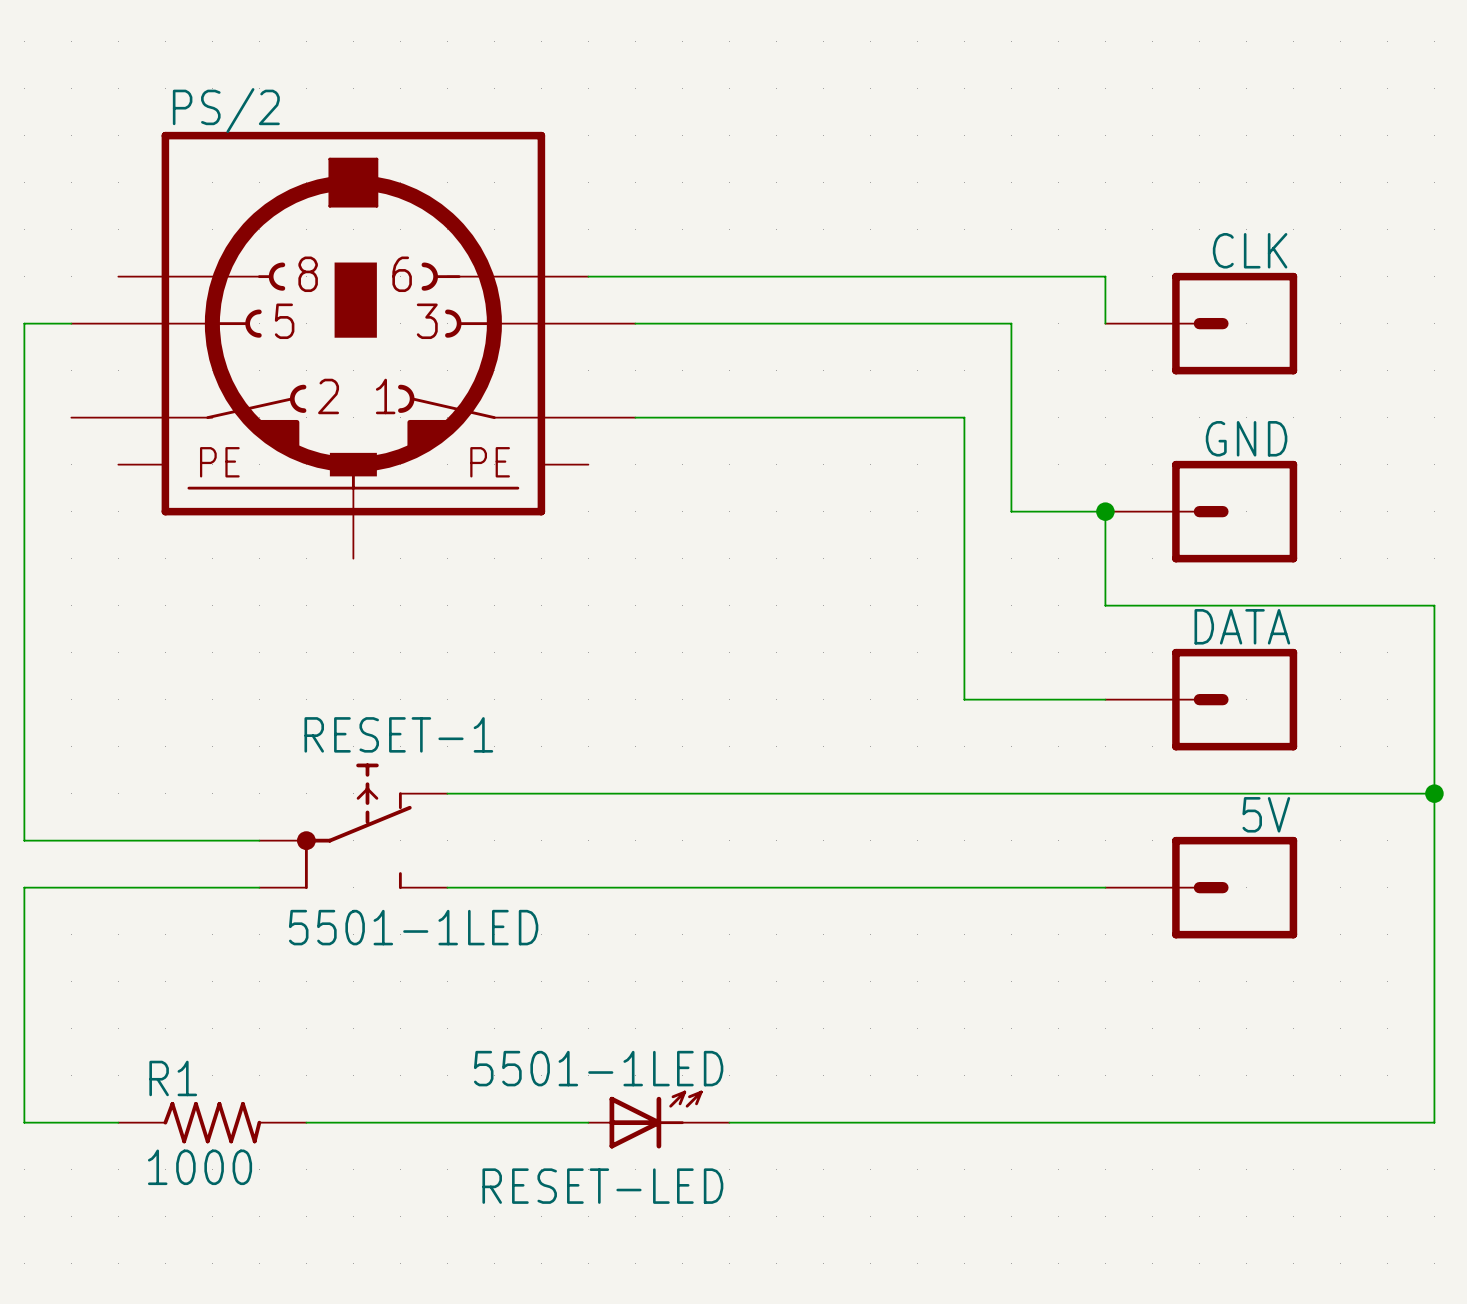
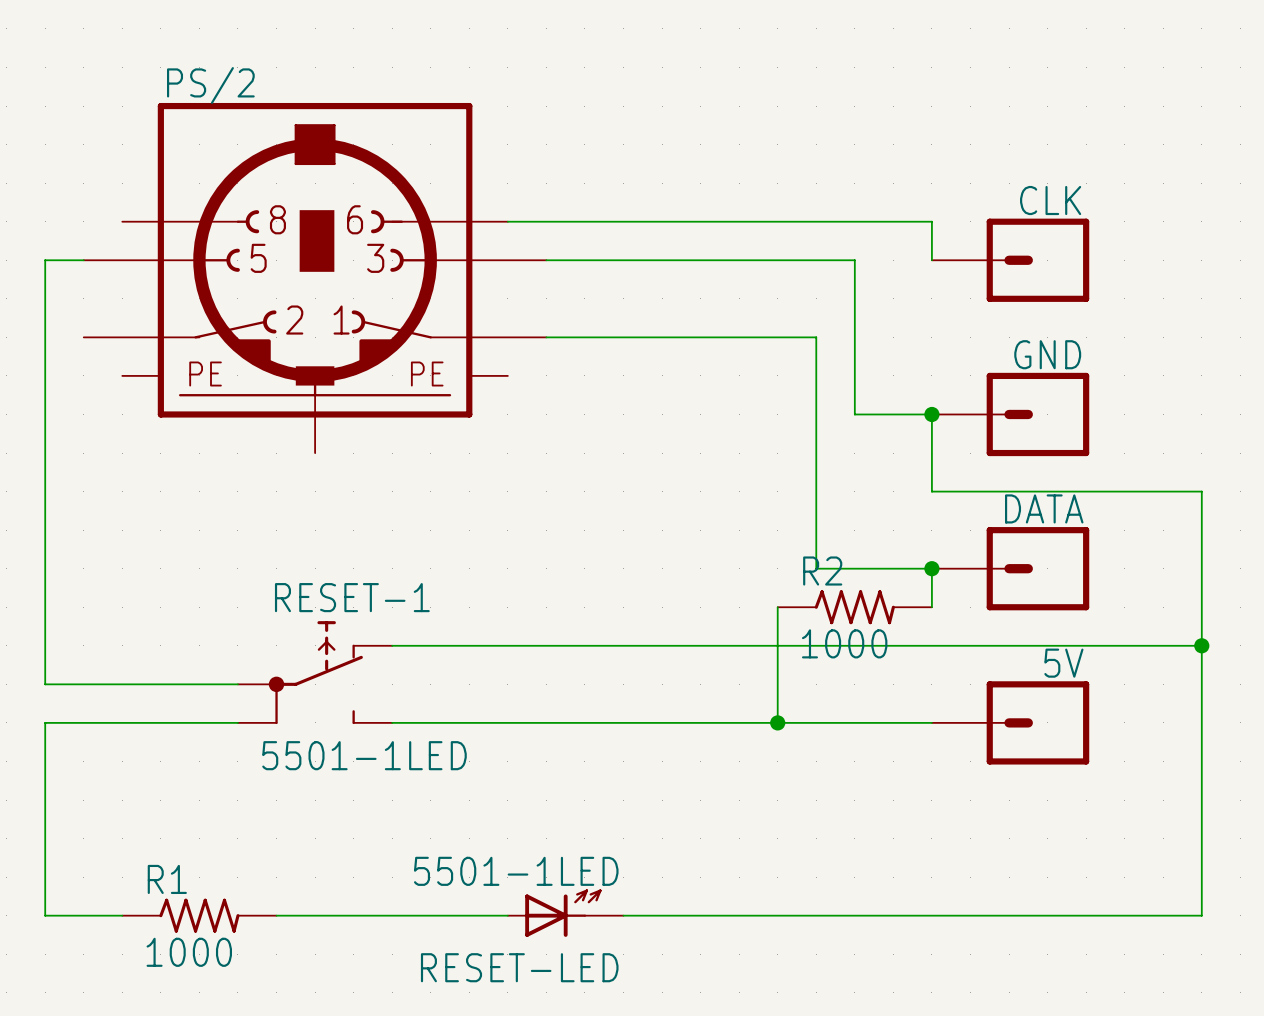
wire: none -> (931, 568) (931, 607)
junction: none -> (931, 568)
wire: none -> (777, 607) (777, 722)
R2: none -> 1000 (854, 607)
junction: none -> (777, 722)

